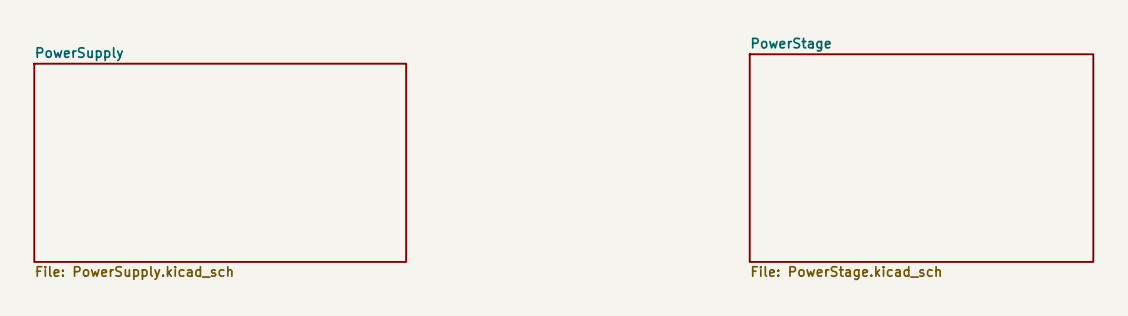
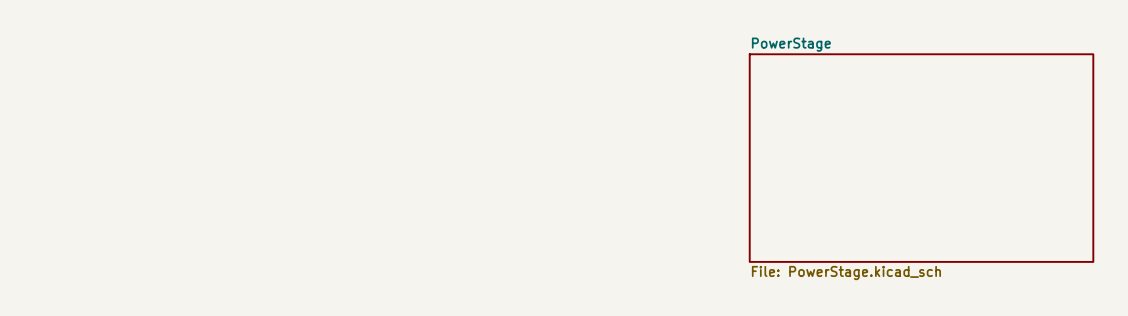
sheet PowerSupply: File: PowerSupply.kicad_sch (220, 162) -> none

